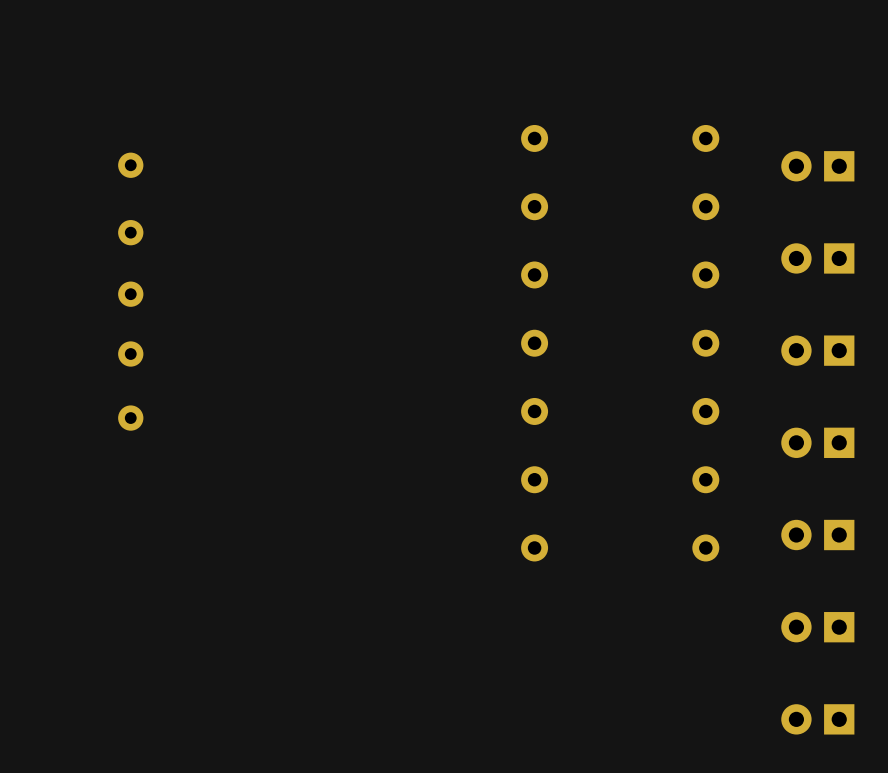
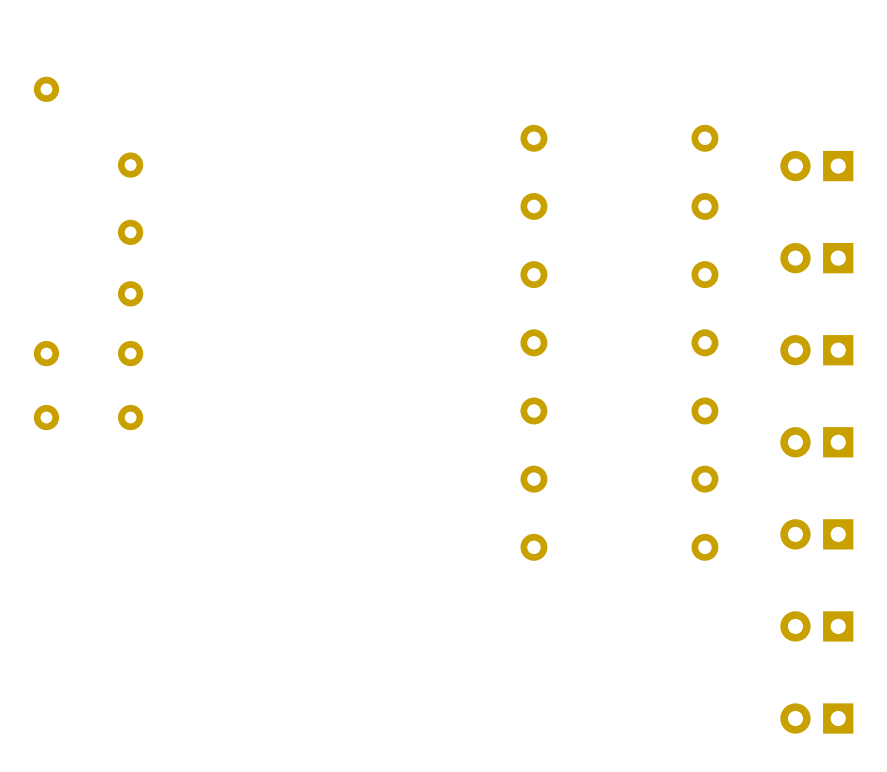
part: none -> (46, 89)
part: none -> (46, 353)
part: none -> (46, 417)

